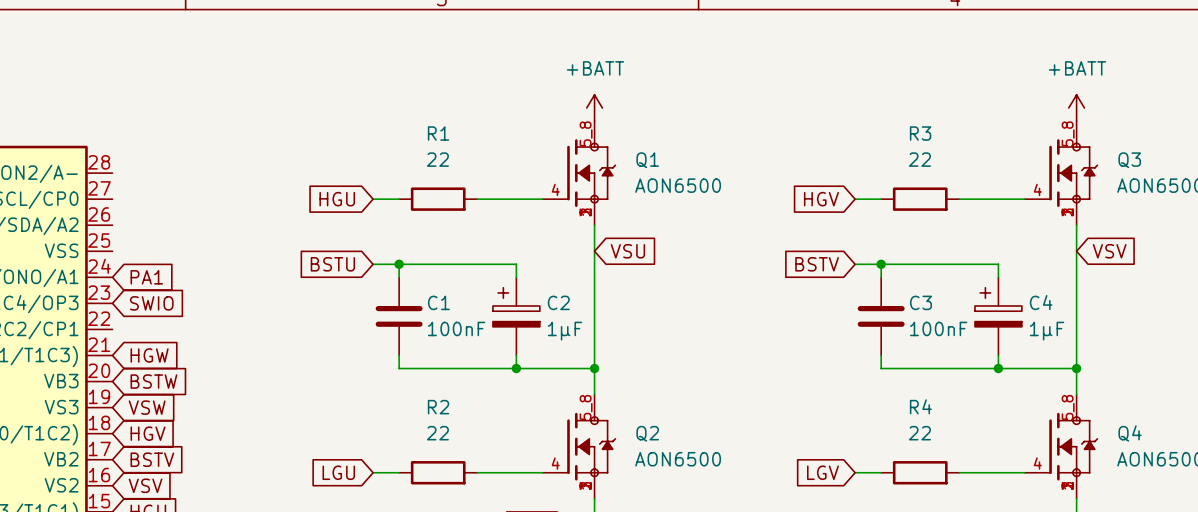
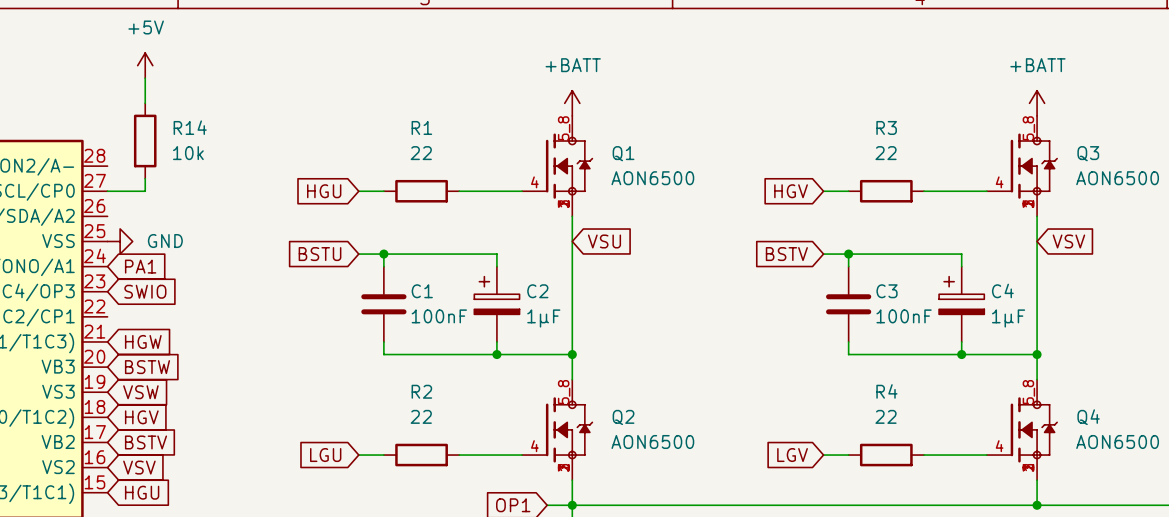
power symbol: none -> +5V (145, 65)
wire: none -> (145, 78) (145, 103)
R14: none -> 10k (145, 141)
wire: none -> (145, 178) (145, 191) (107, 191)
power symbol: none -> GND (120, 241)

